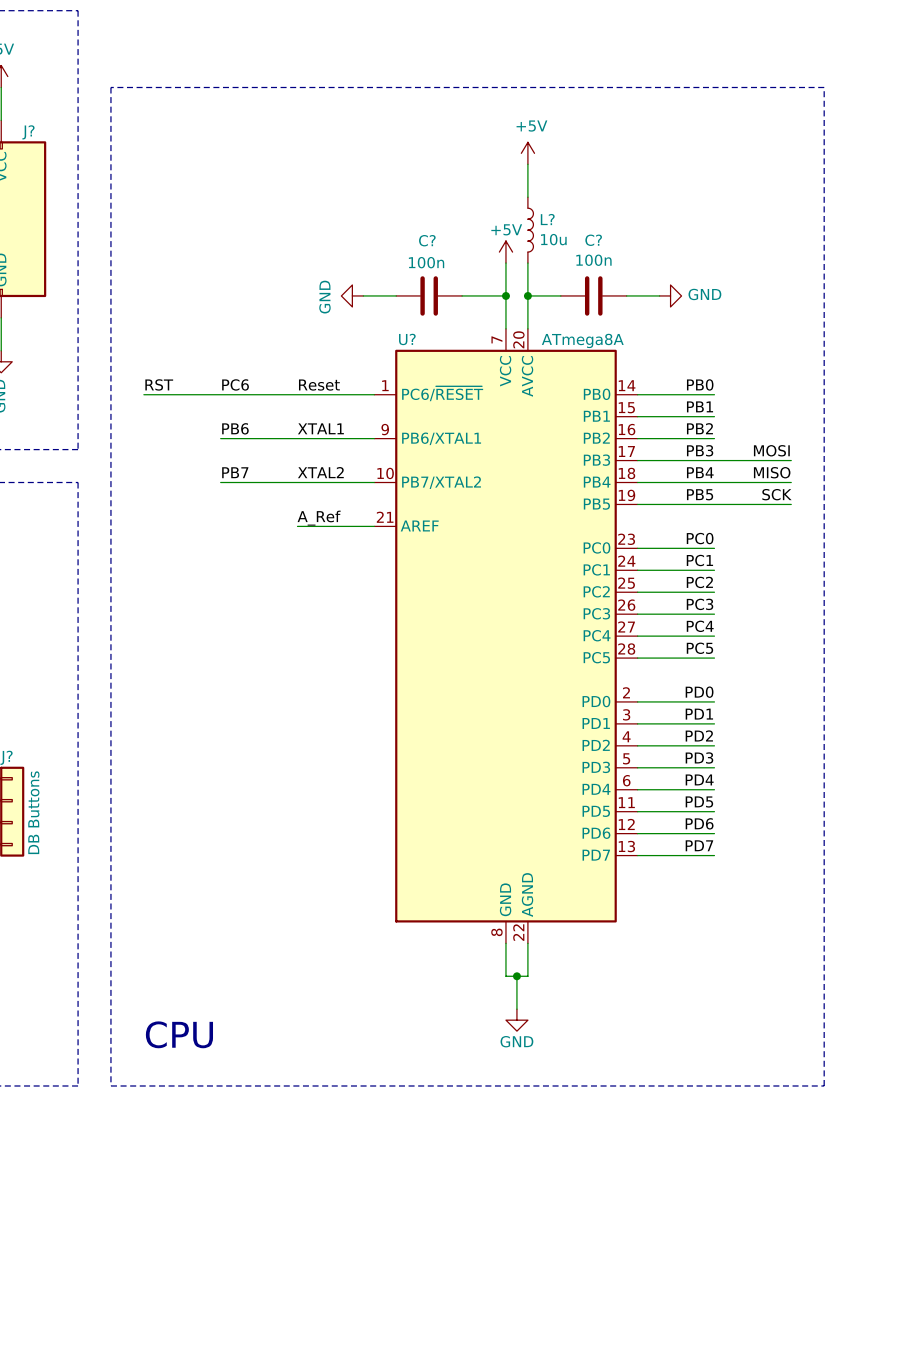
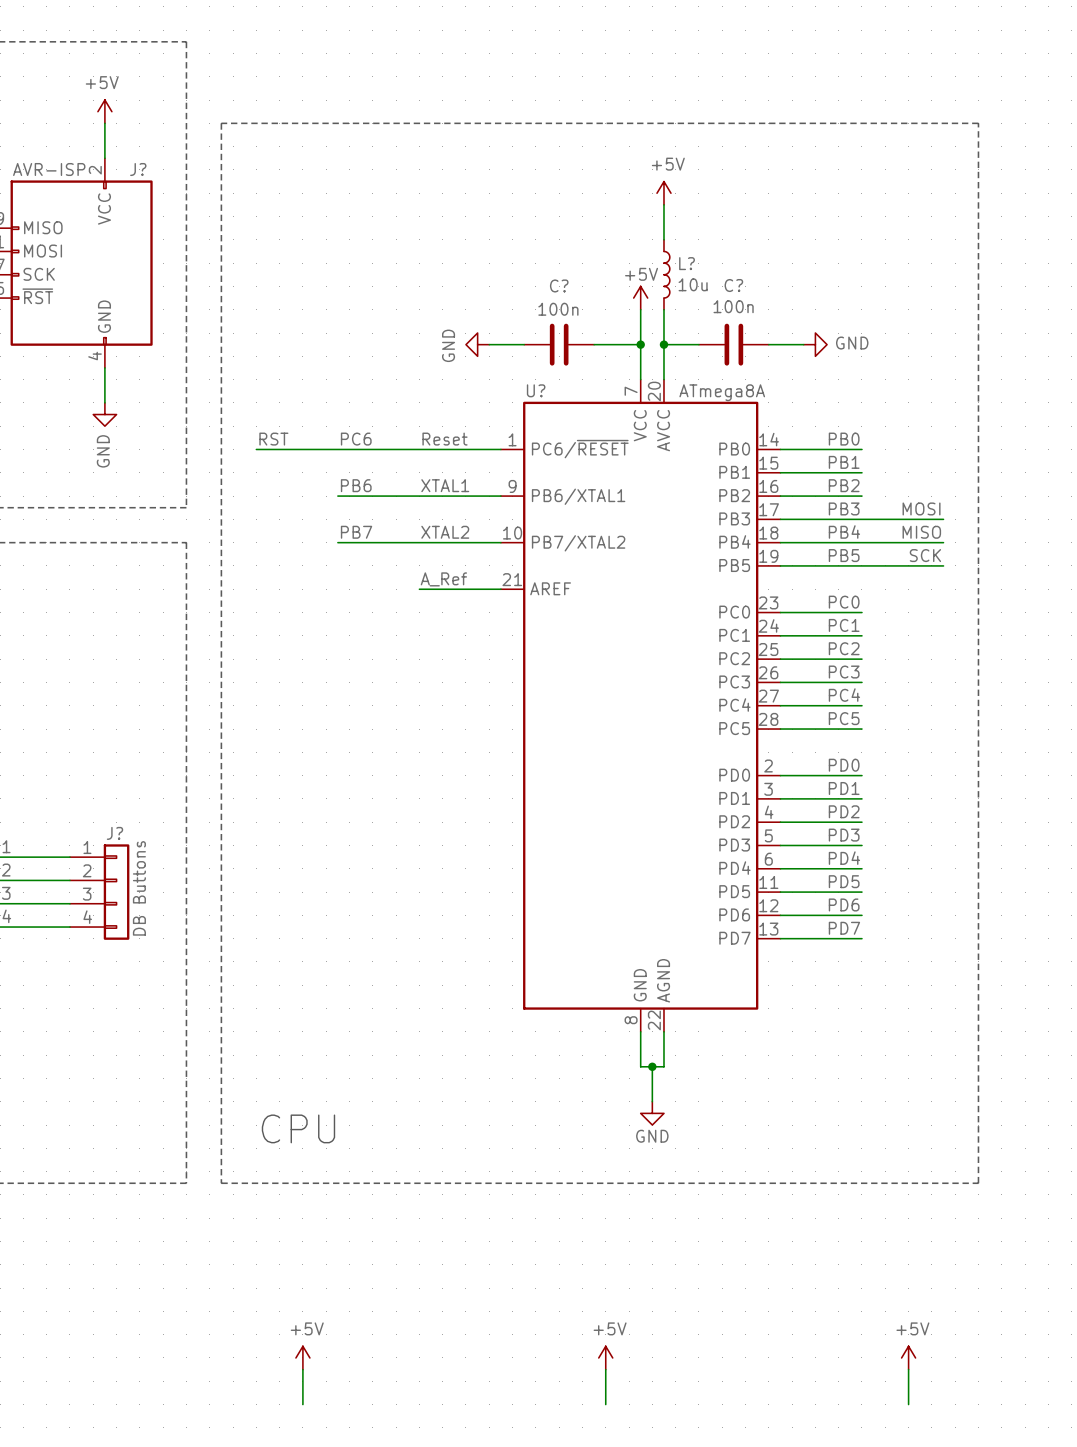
power symbol: none -> +5V (302, 1357)
power symbol: none -> +5V (605, 1357)
power symbol: none -> +5V (908, 1357)
wire: none -> (302, 1369) (302, 1404)
wire: none -> (605, 1369) (605, 1404)
wire: none -> (908, 1369) (908, 1404)

